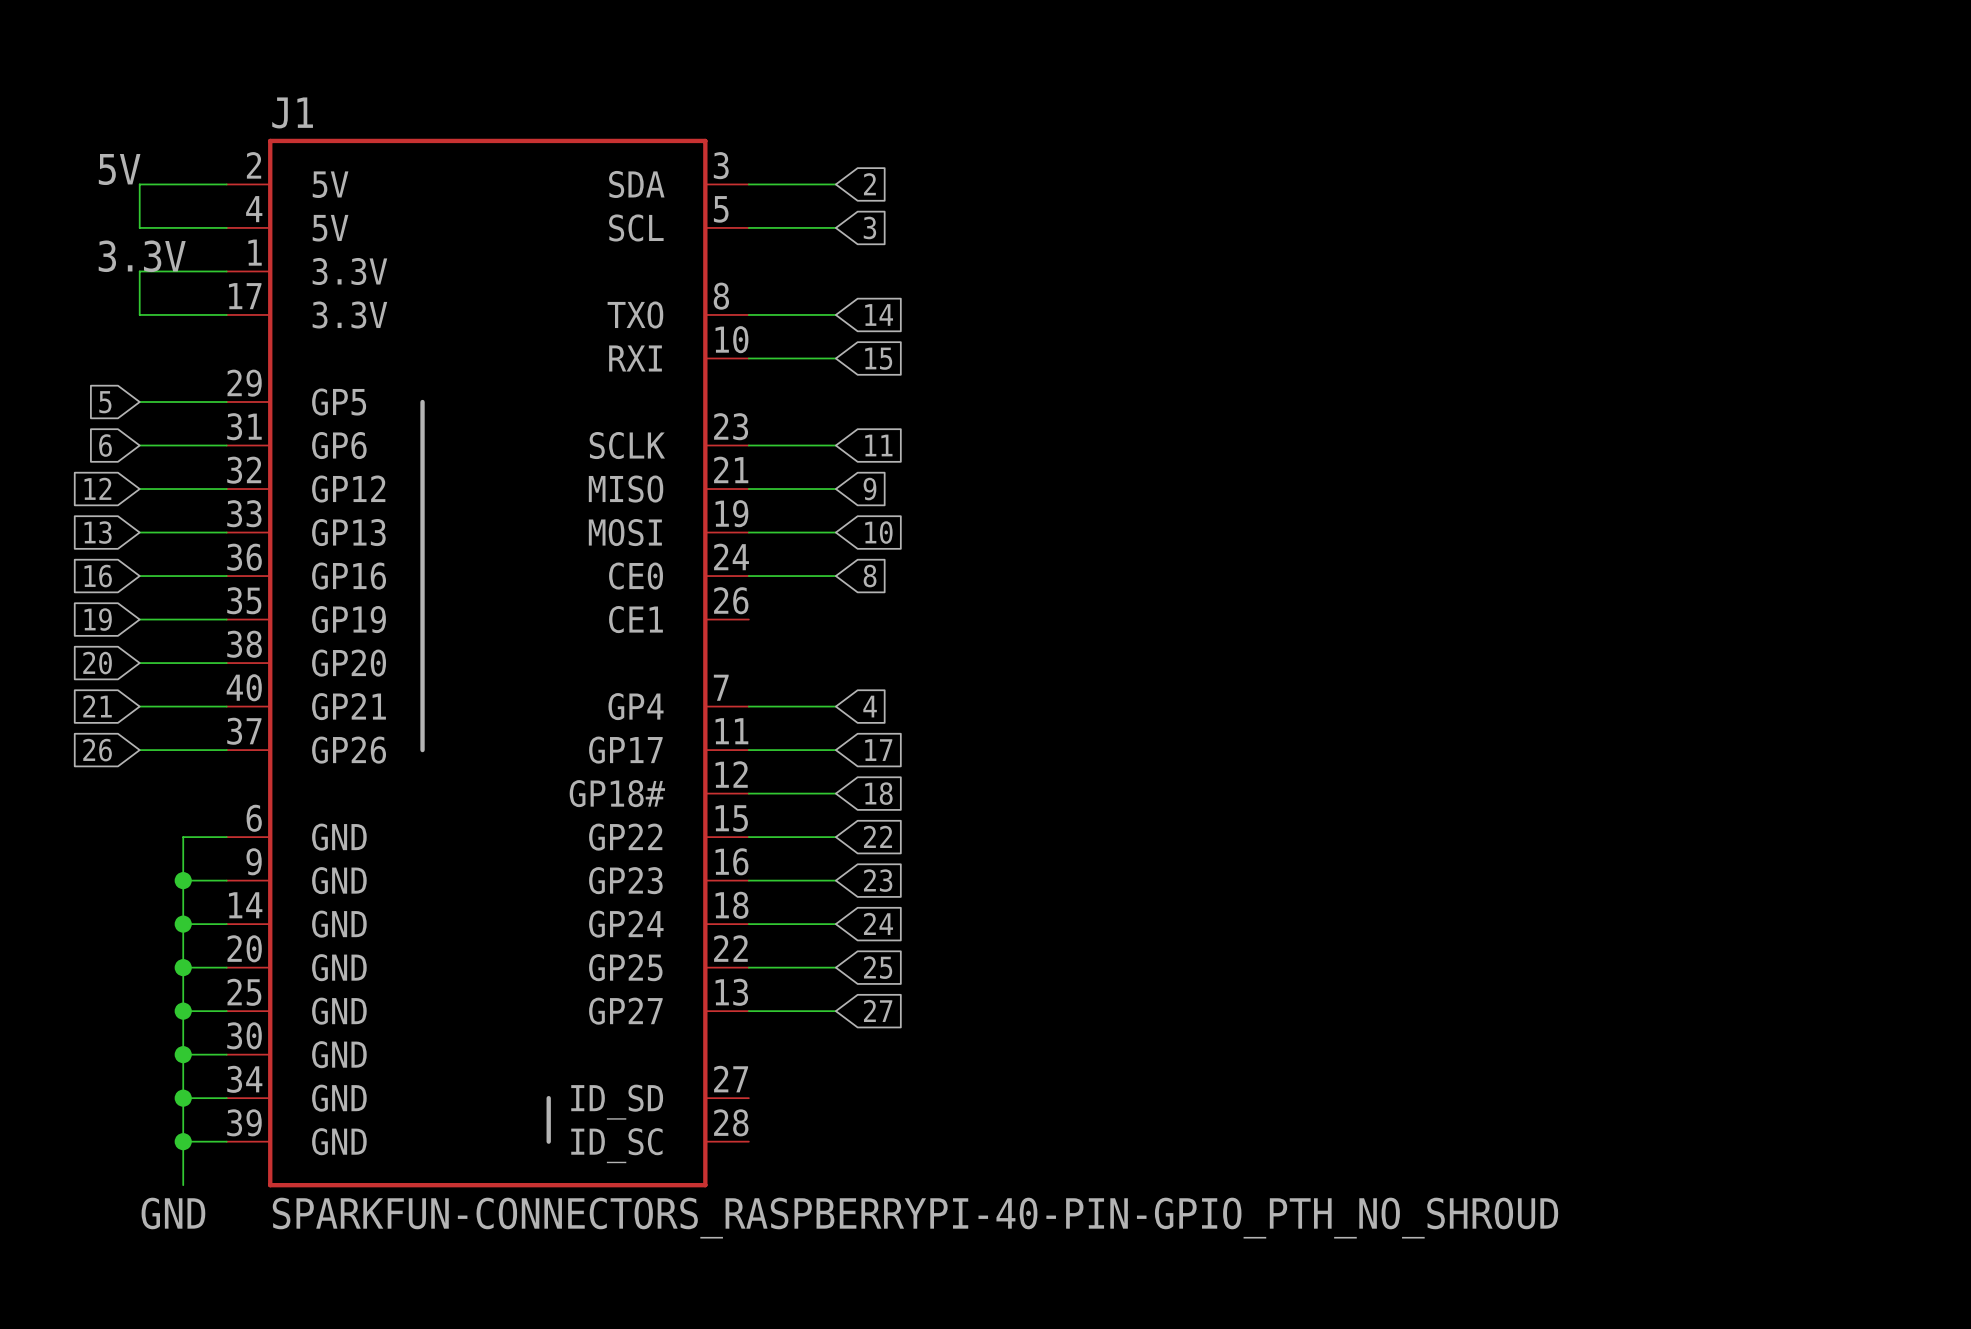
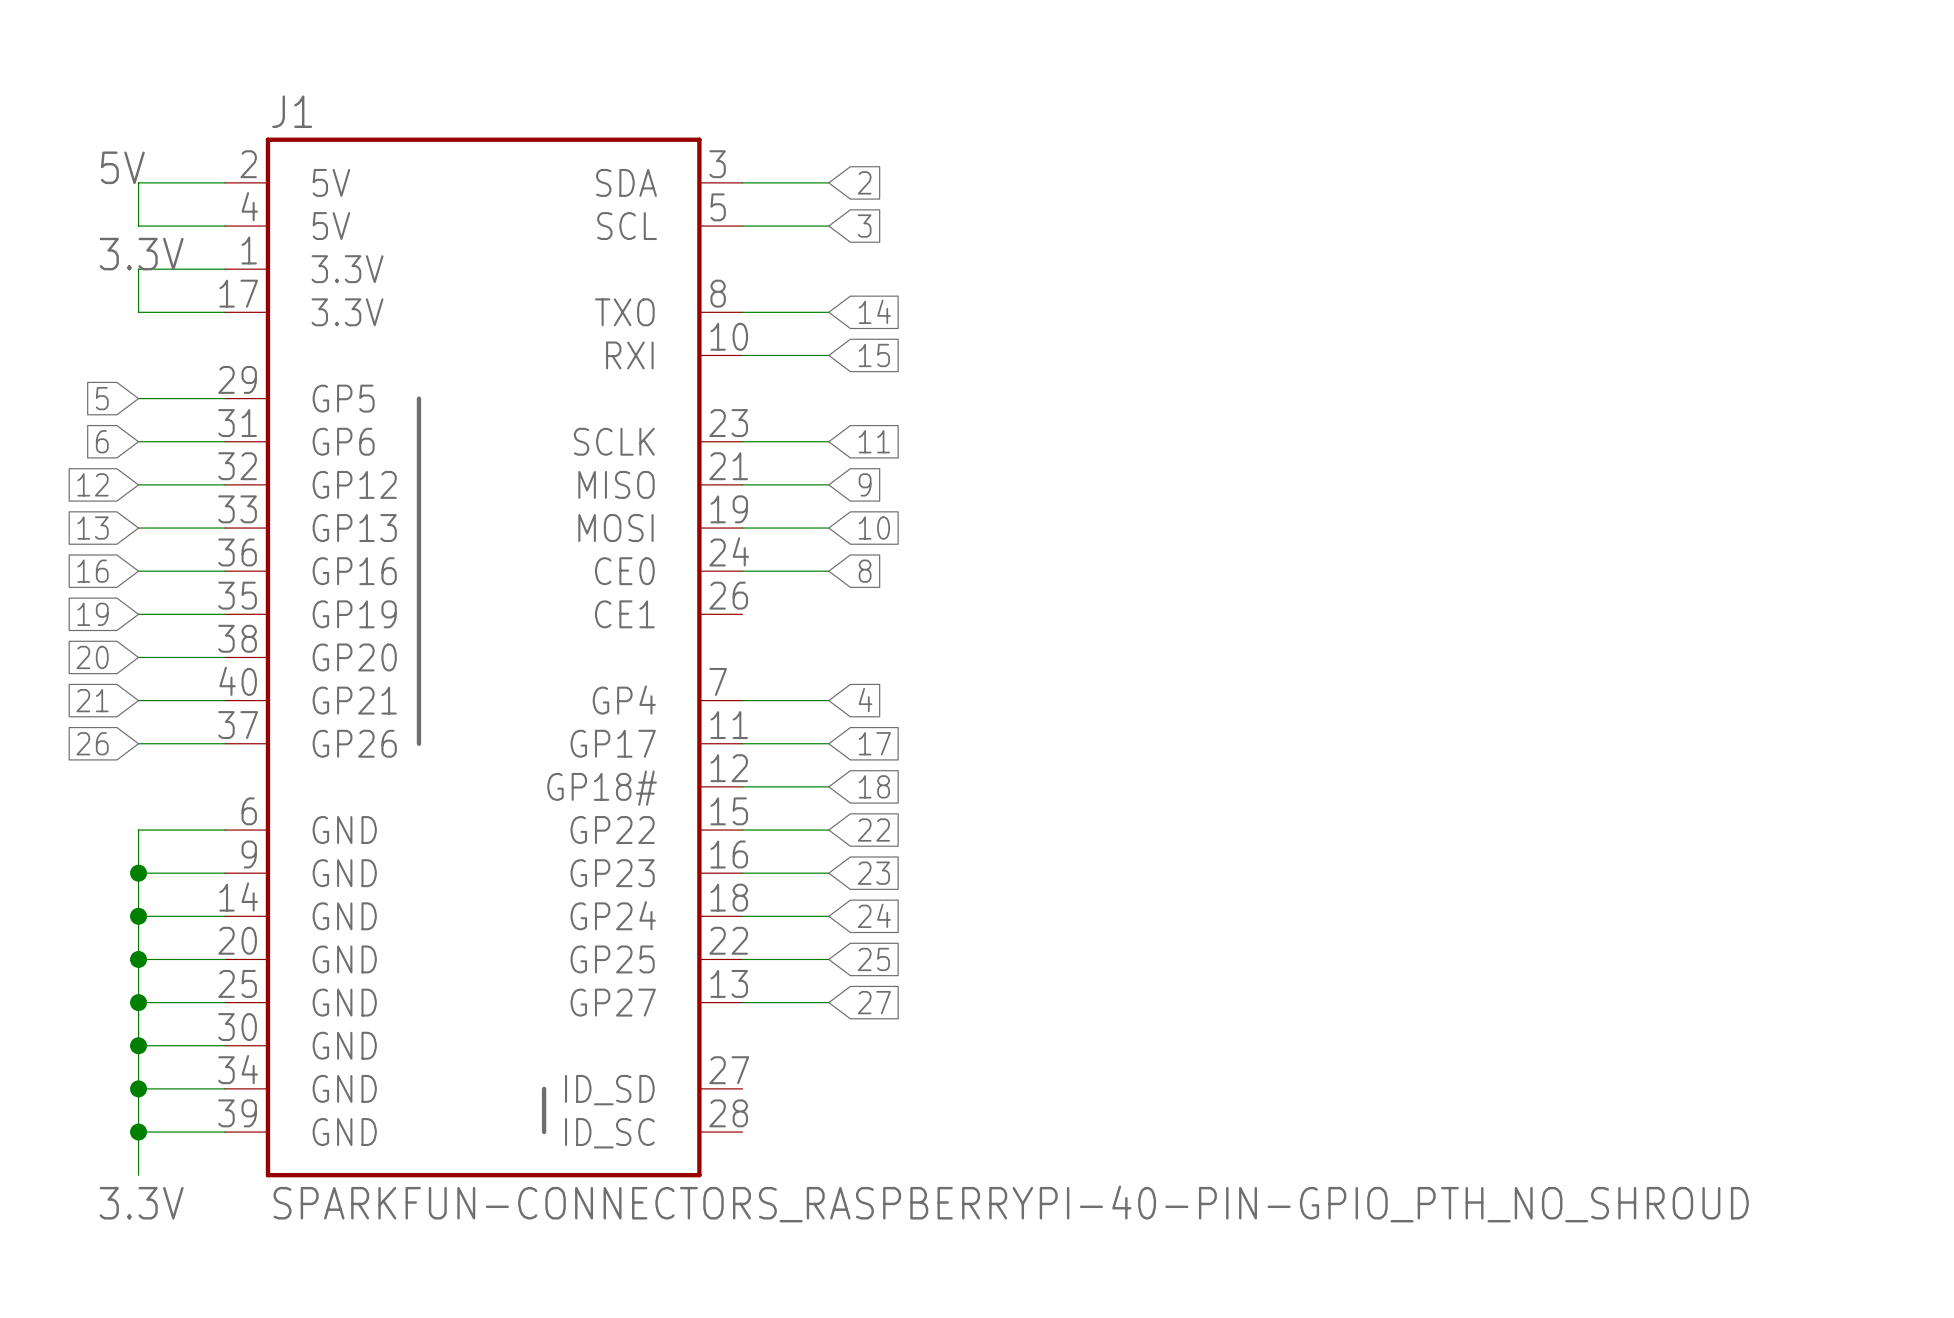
wire: (183, 837) (183, 1185) -> (181, 830) (138, 830) (138, 1175)
wire: none -> (138, 873) (181, 873)
junction: none -> (138, 873)
junction: (183, 880) -> none
wire: none -> (138, 916) (181, 916)
junction: none -> (138, 916)
junction: (183, 924) -> none
wire: none -> (138, 959) (181, 959)
junction: none -> (138, 959)
junction: (183, 967) -> none
wire: none -> (138, 1002) (181, 1002)
junction: none -> (138, 1002)
junction: (183, 1011) -> none
wire: none -> (138, 1045) (181, 1045)
junction: none -> (138, 1045)
junction: (183, 1054) -> none
wire: none -> (138, 1088) (181, 1088)
junction: none -> (138, 1088)
junction: (183, 1098) -> none
wire: none -> (138, 1132) (181, 1132)
junction: none -> (138, 1132)
junction: (183, 1141) -> none
label: none -> 3.3V (141, 1203)
label: GND (173, 1213) -> none

